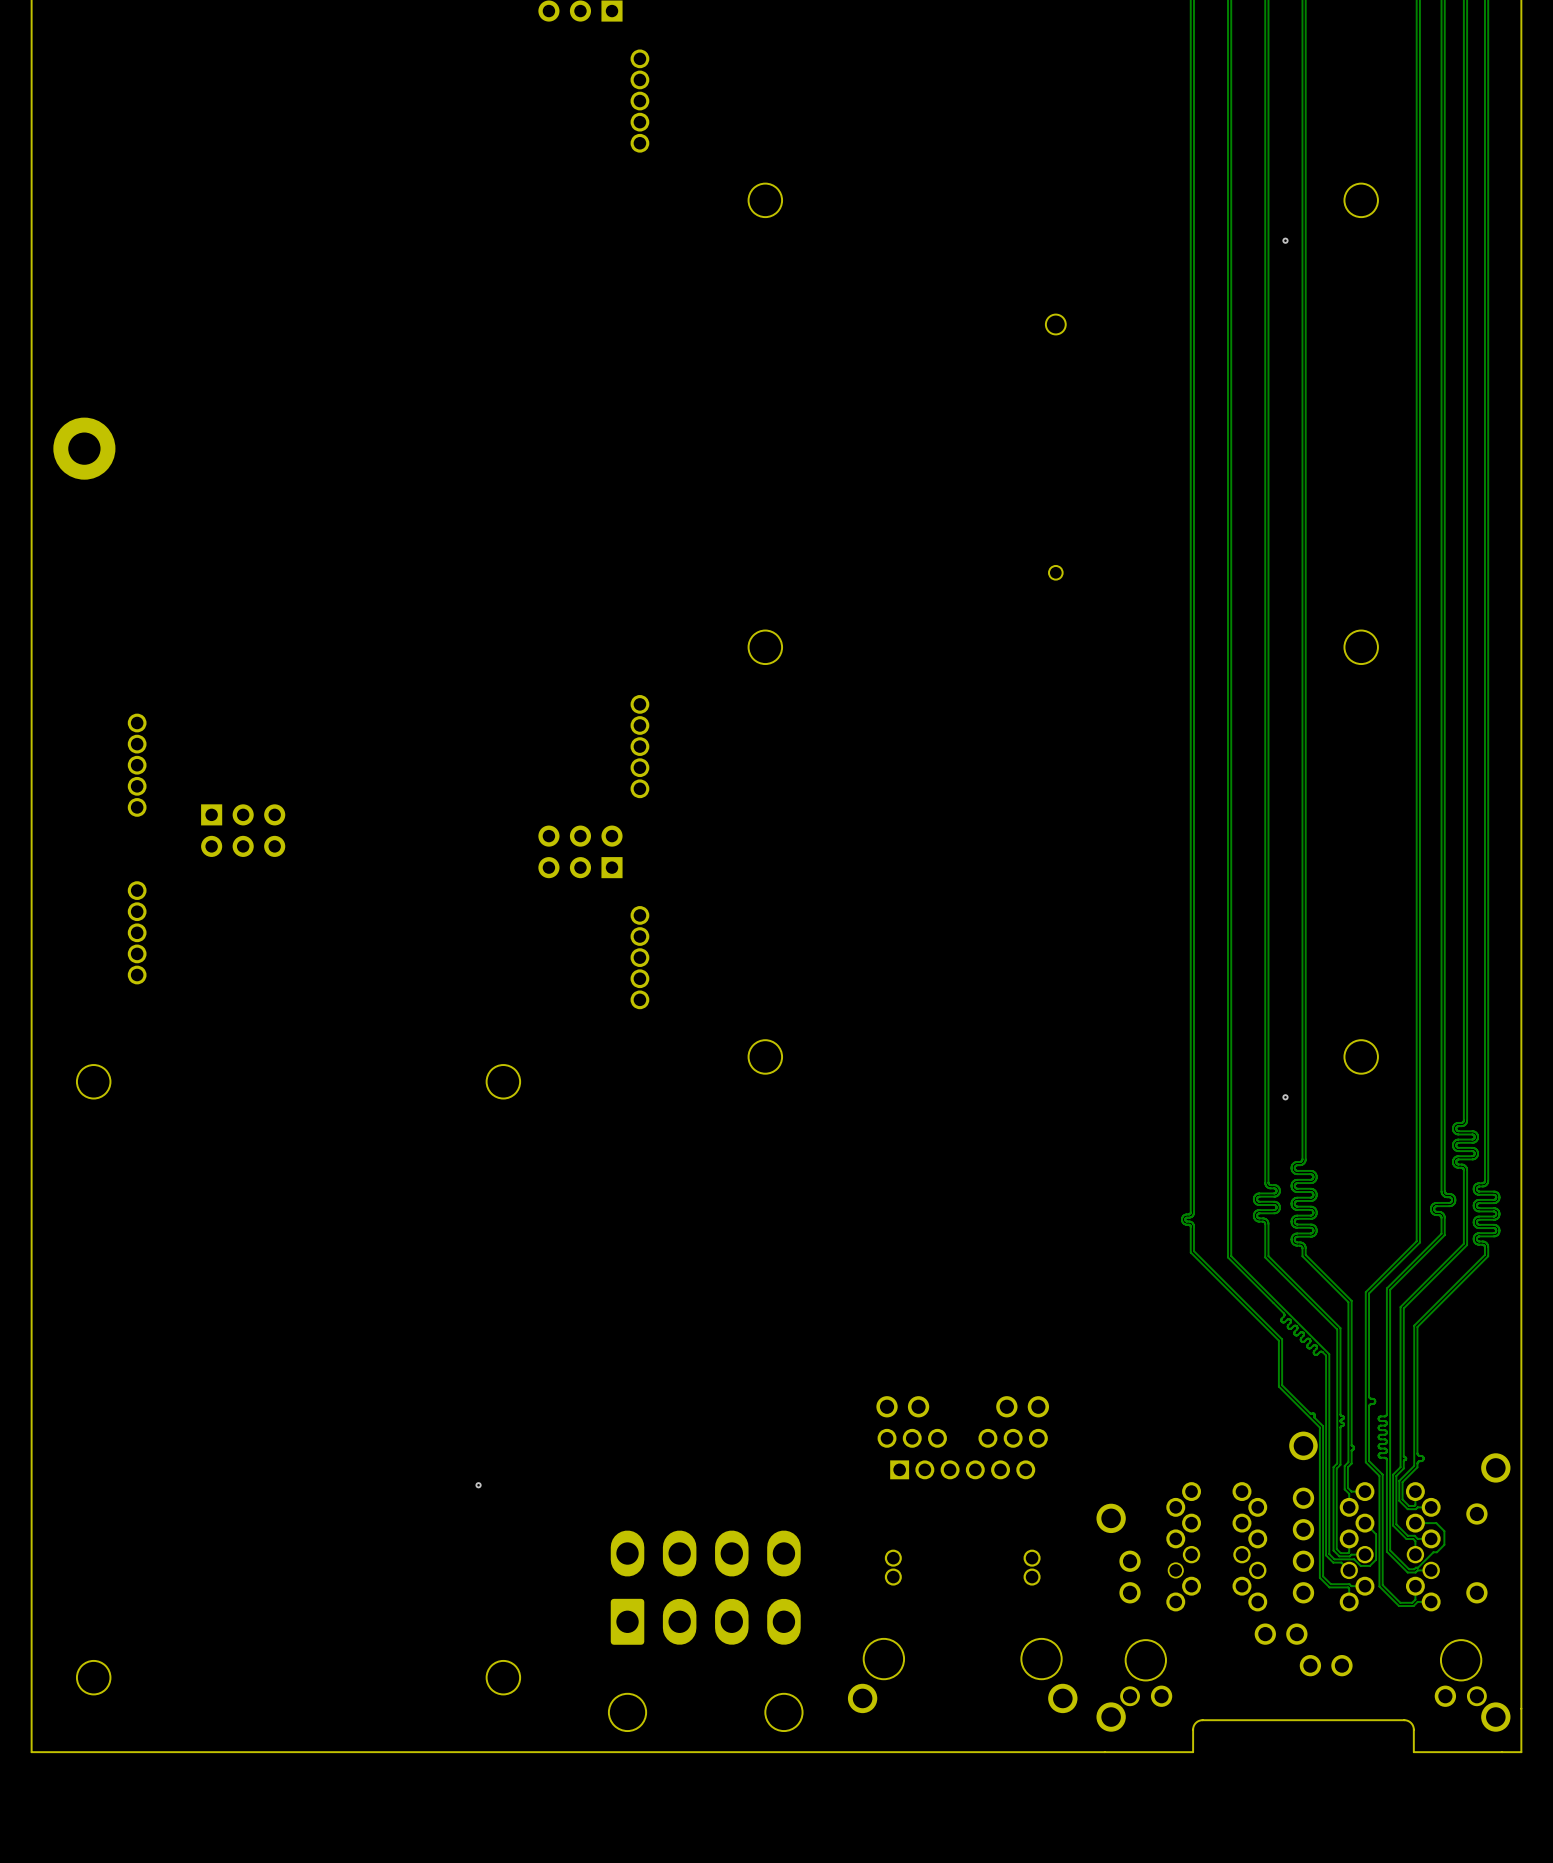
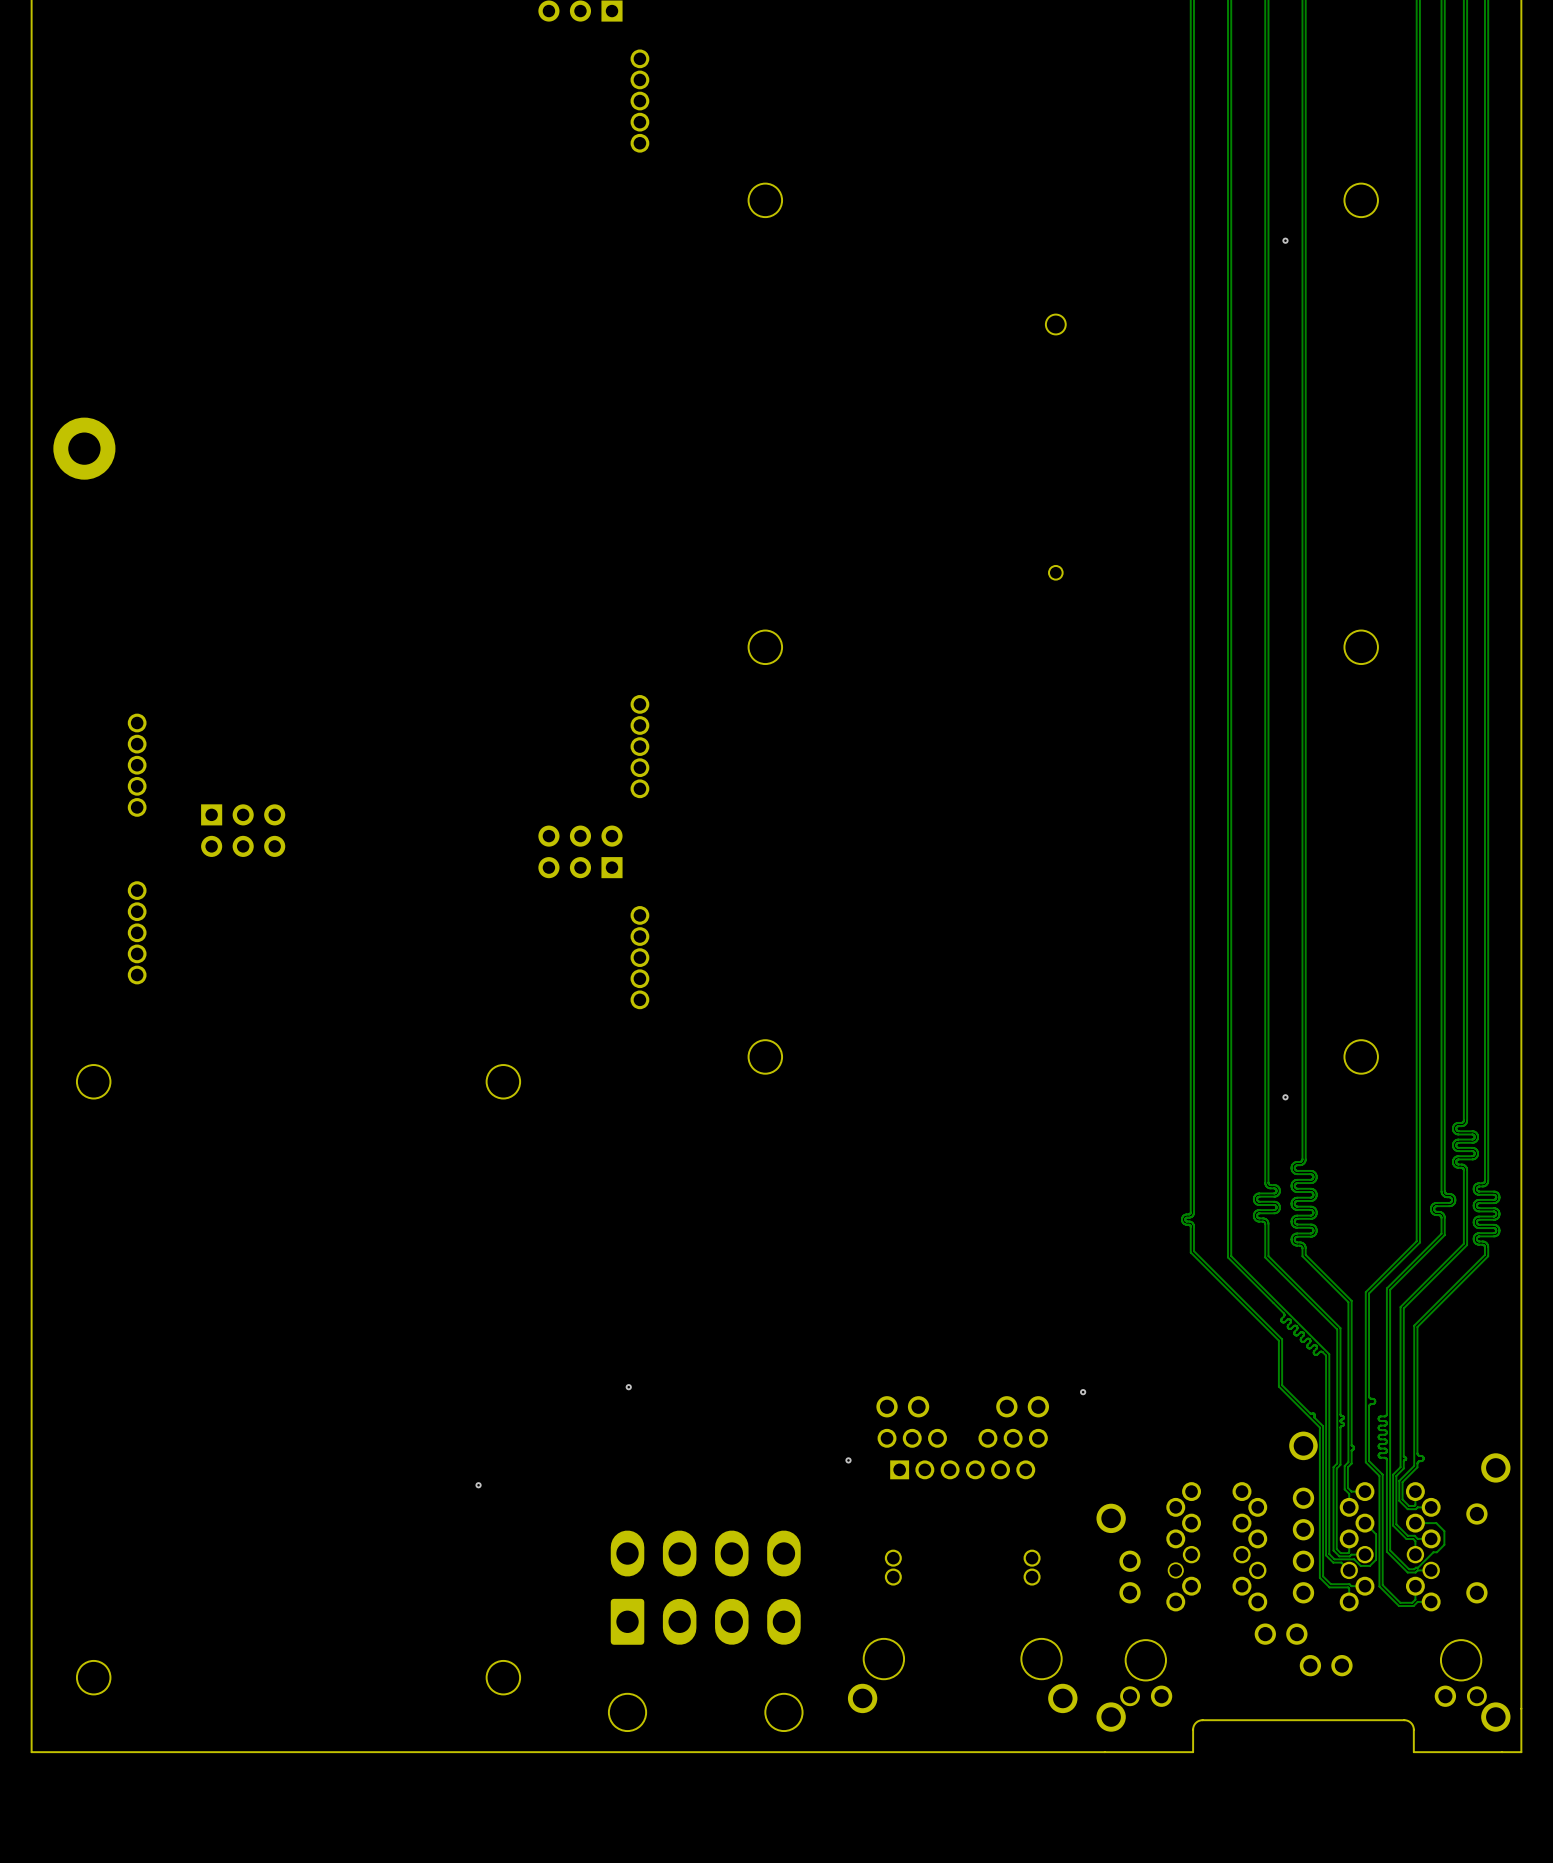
via: none -> (628, 1387)
via: none -> (1083, 1392)
via: none -> (848, 1460)

